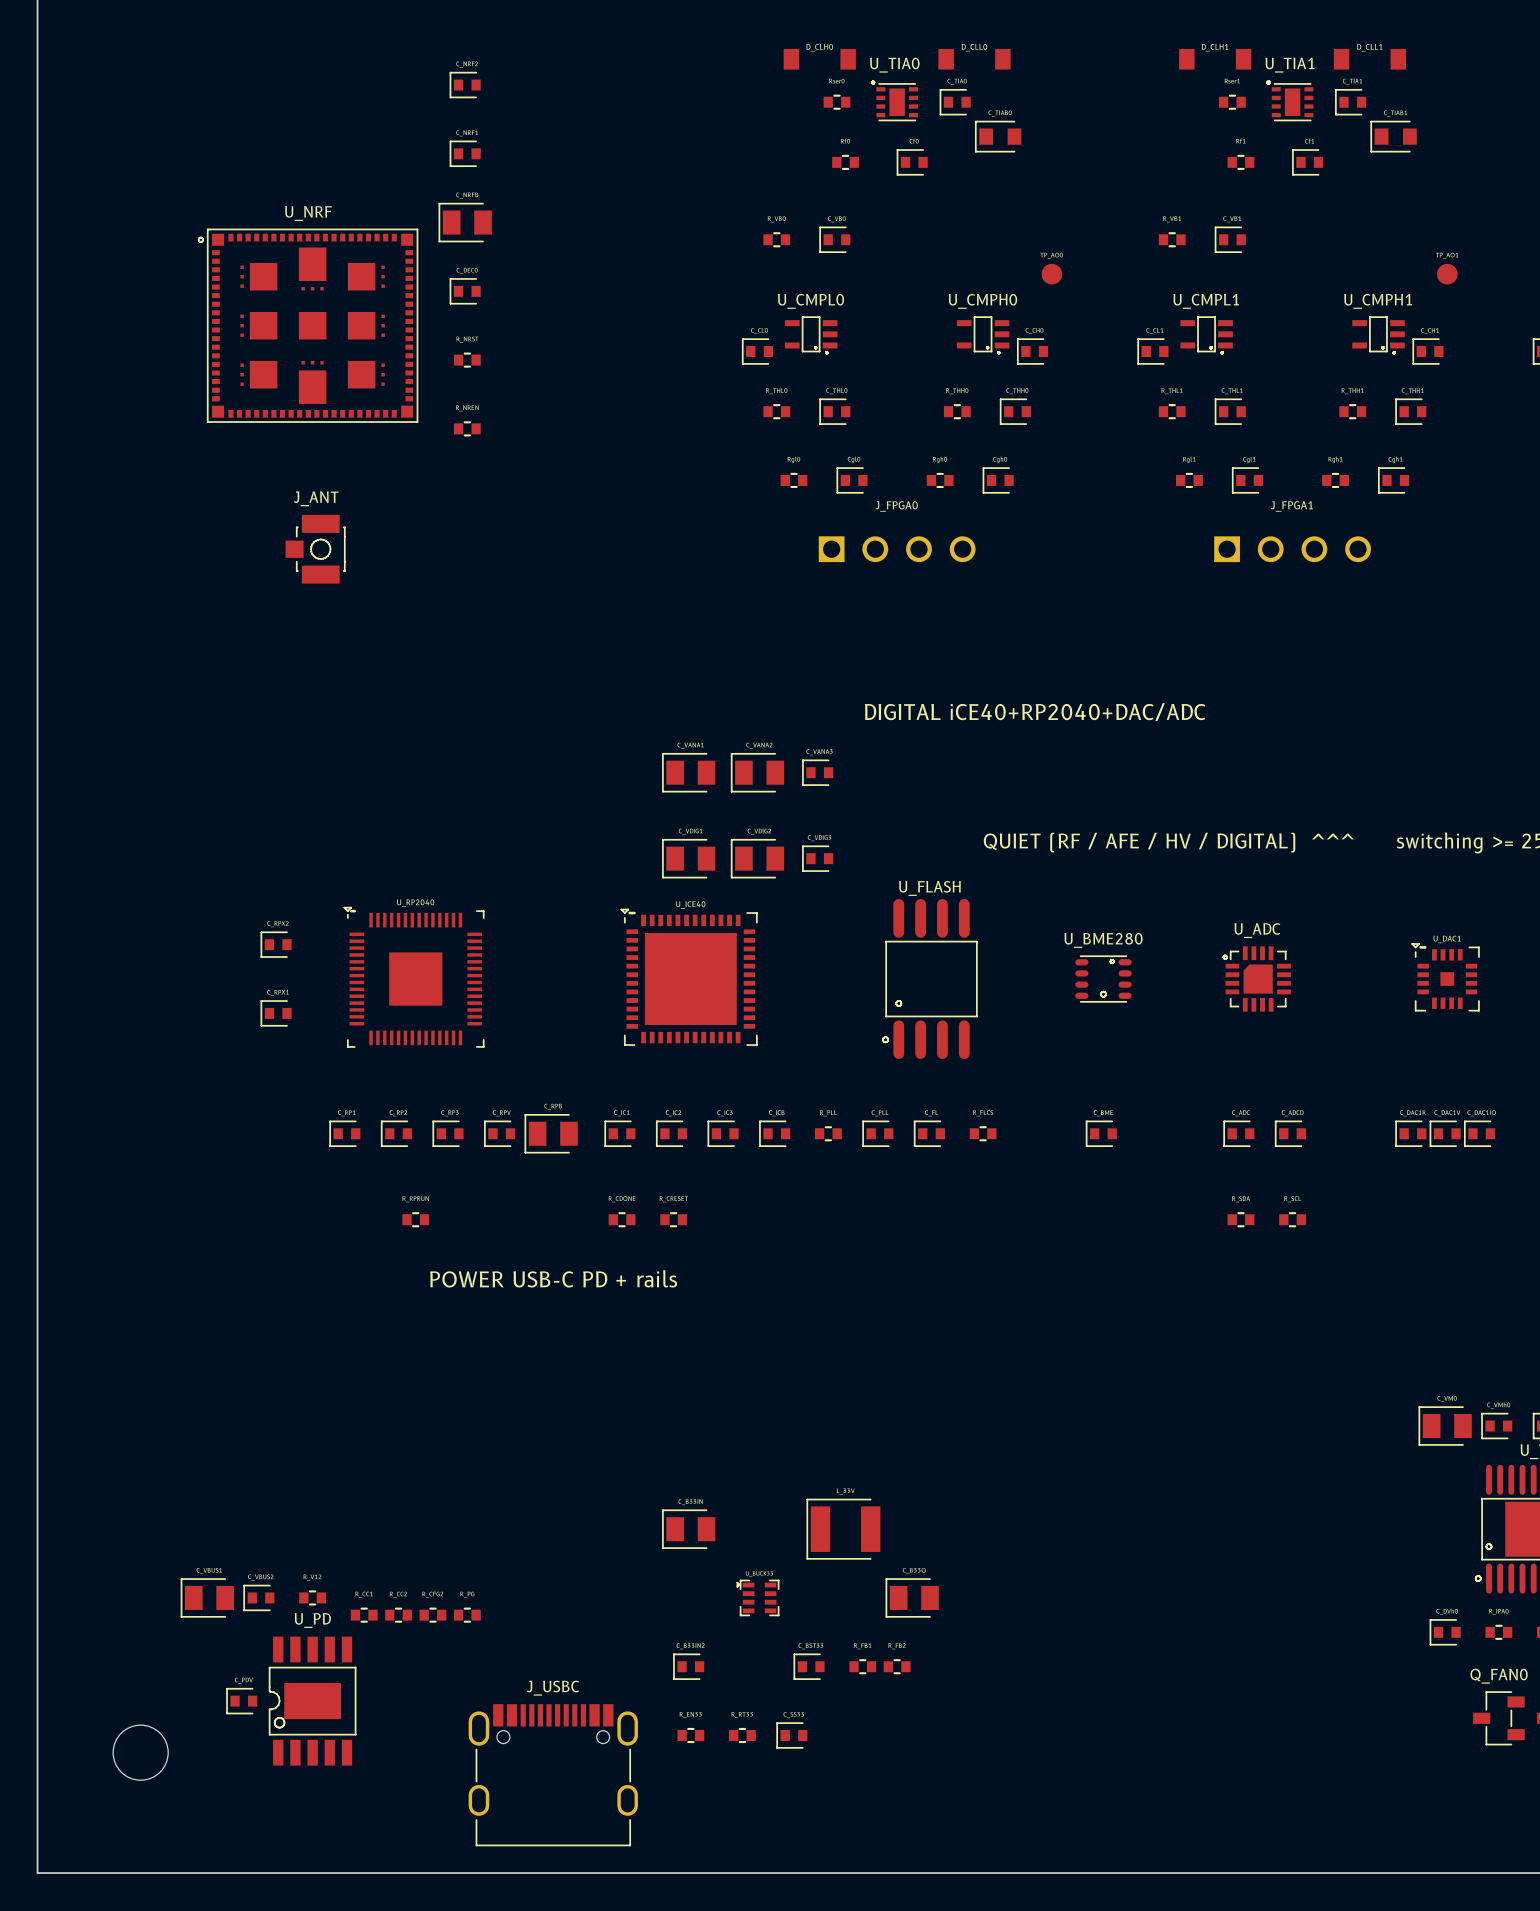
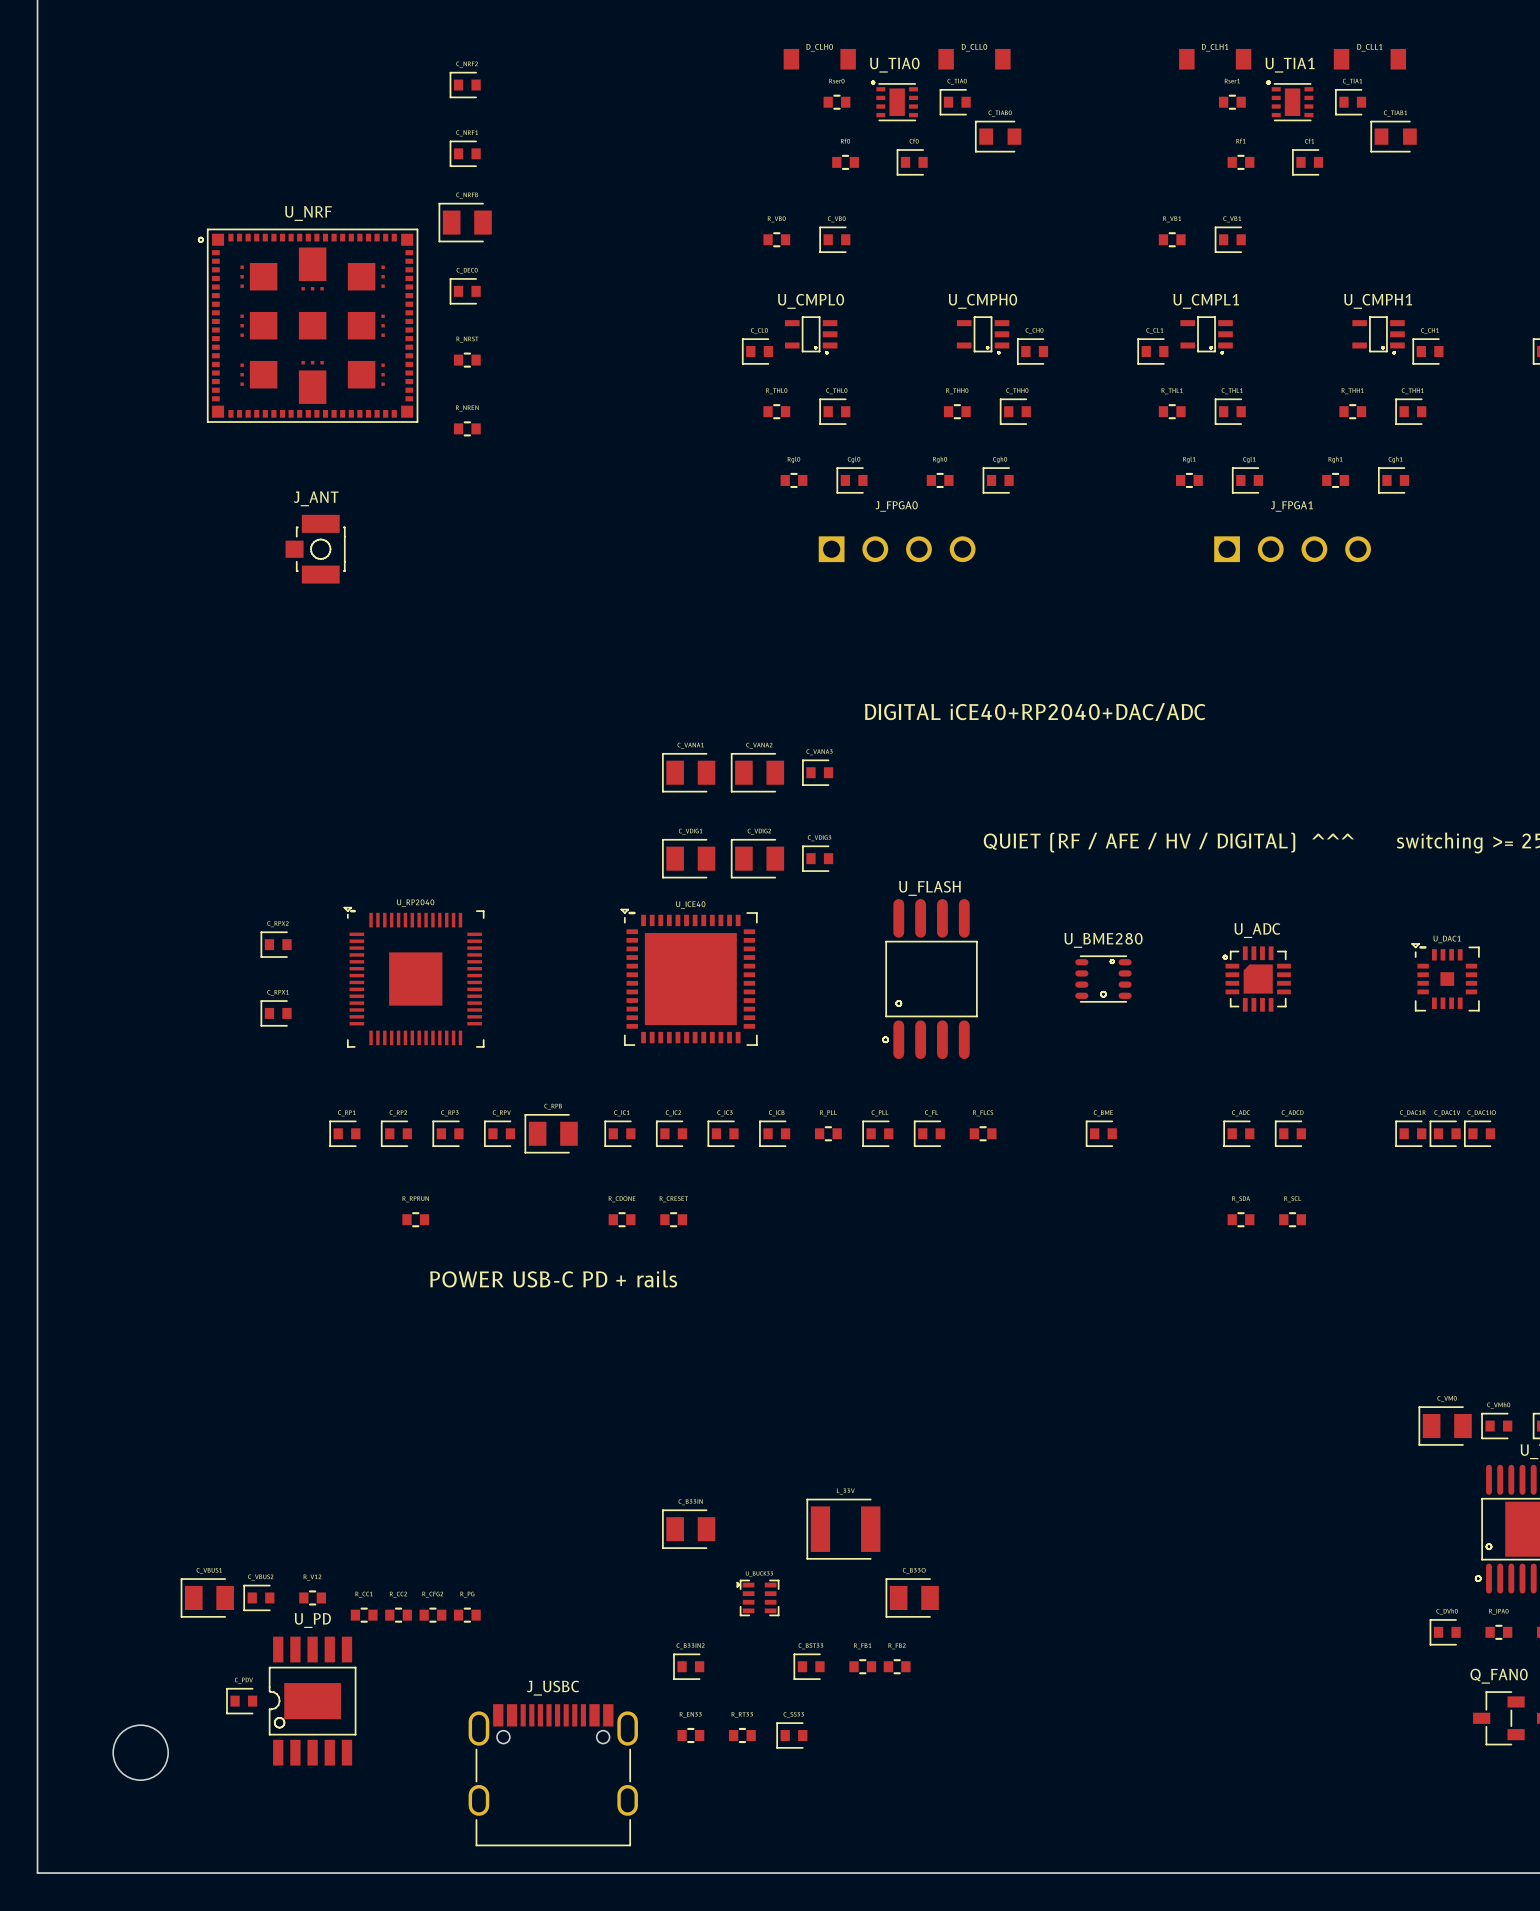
part: (1051, 274) -> none
part: (1447, 274) -> none

